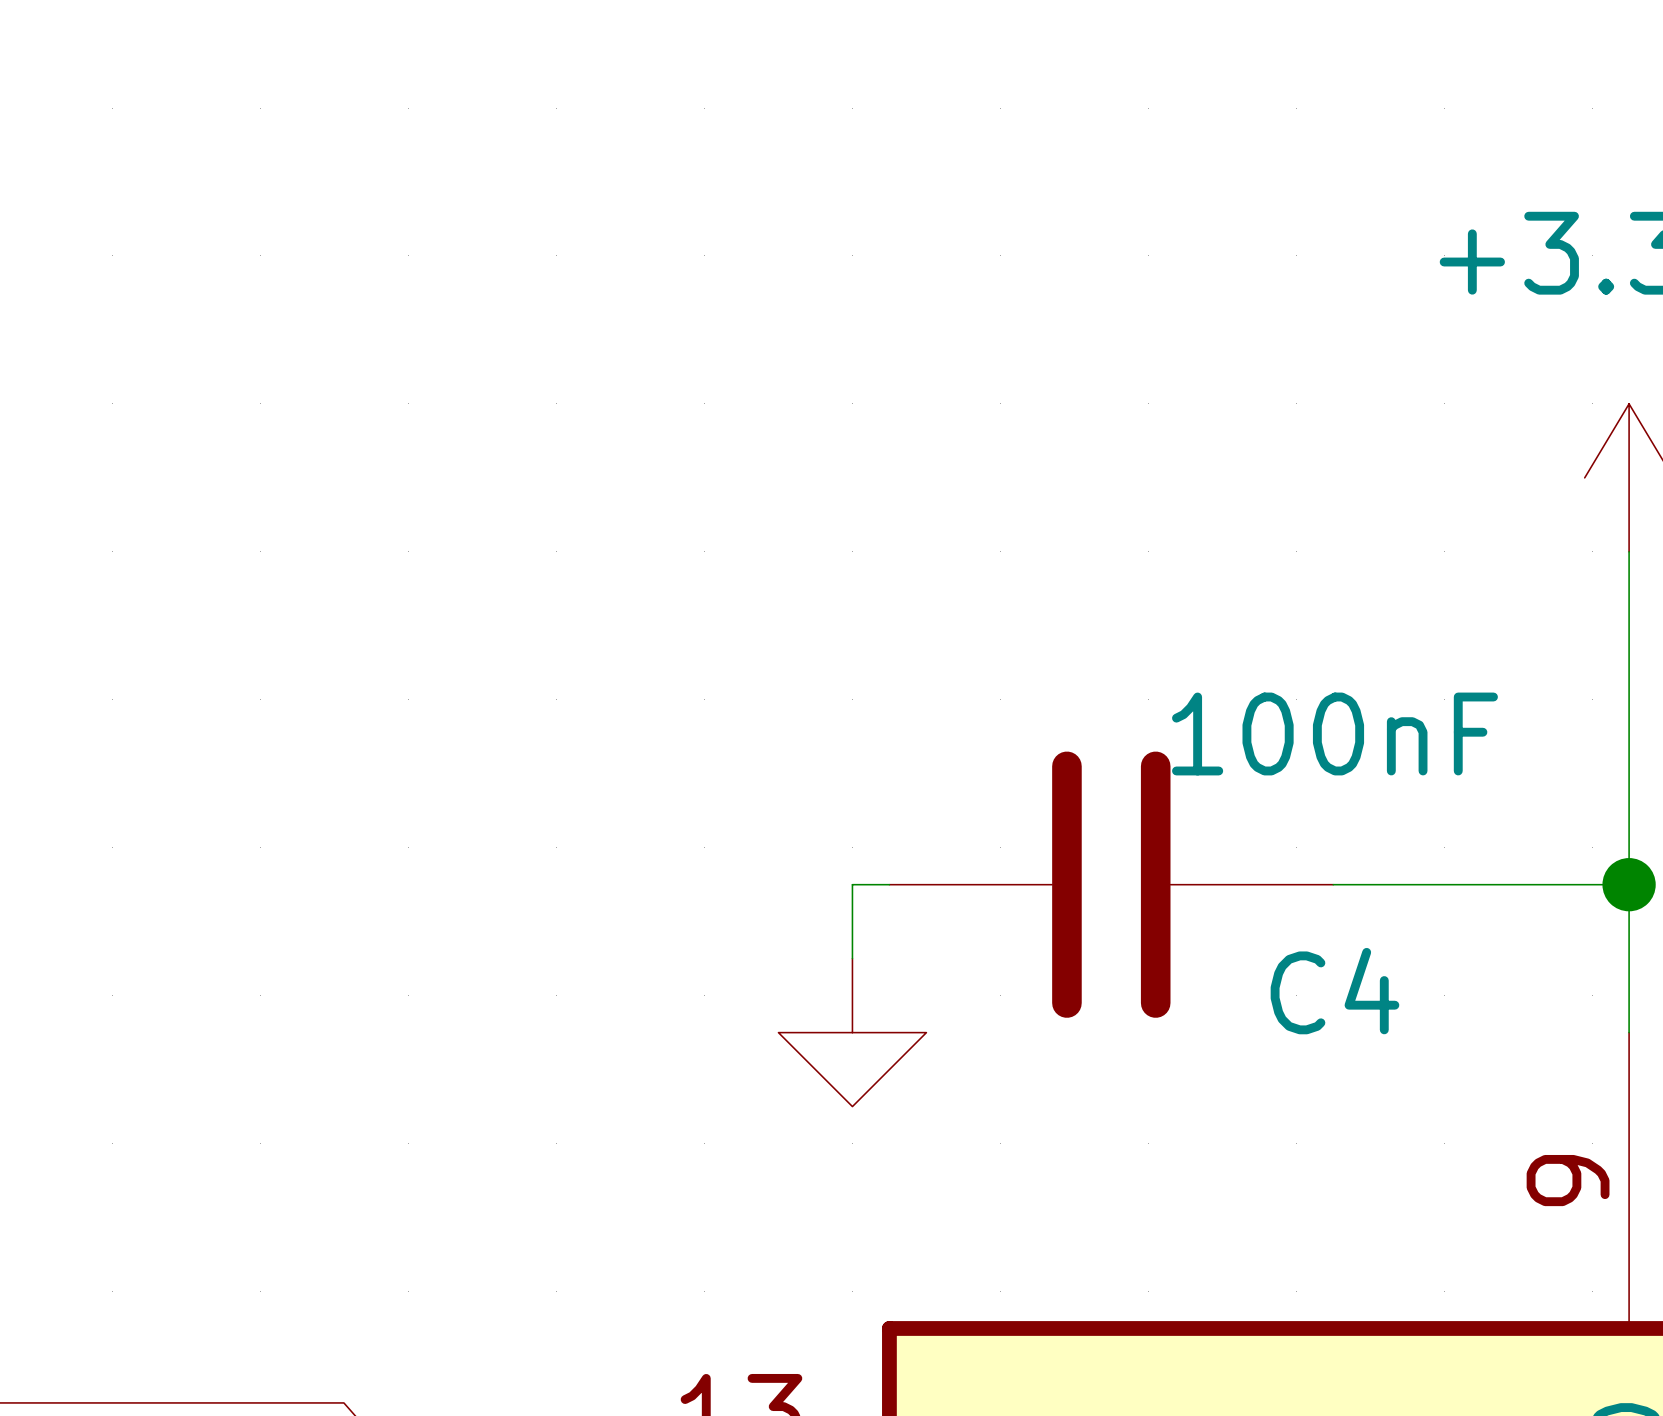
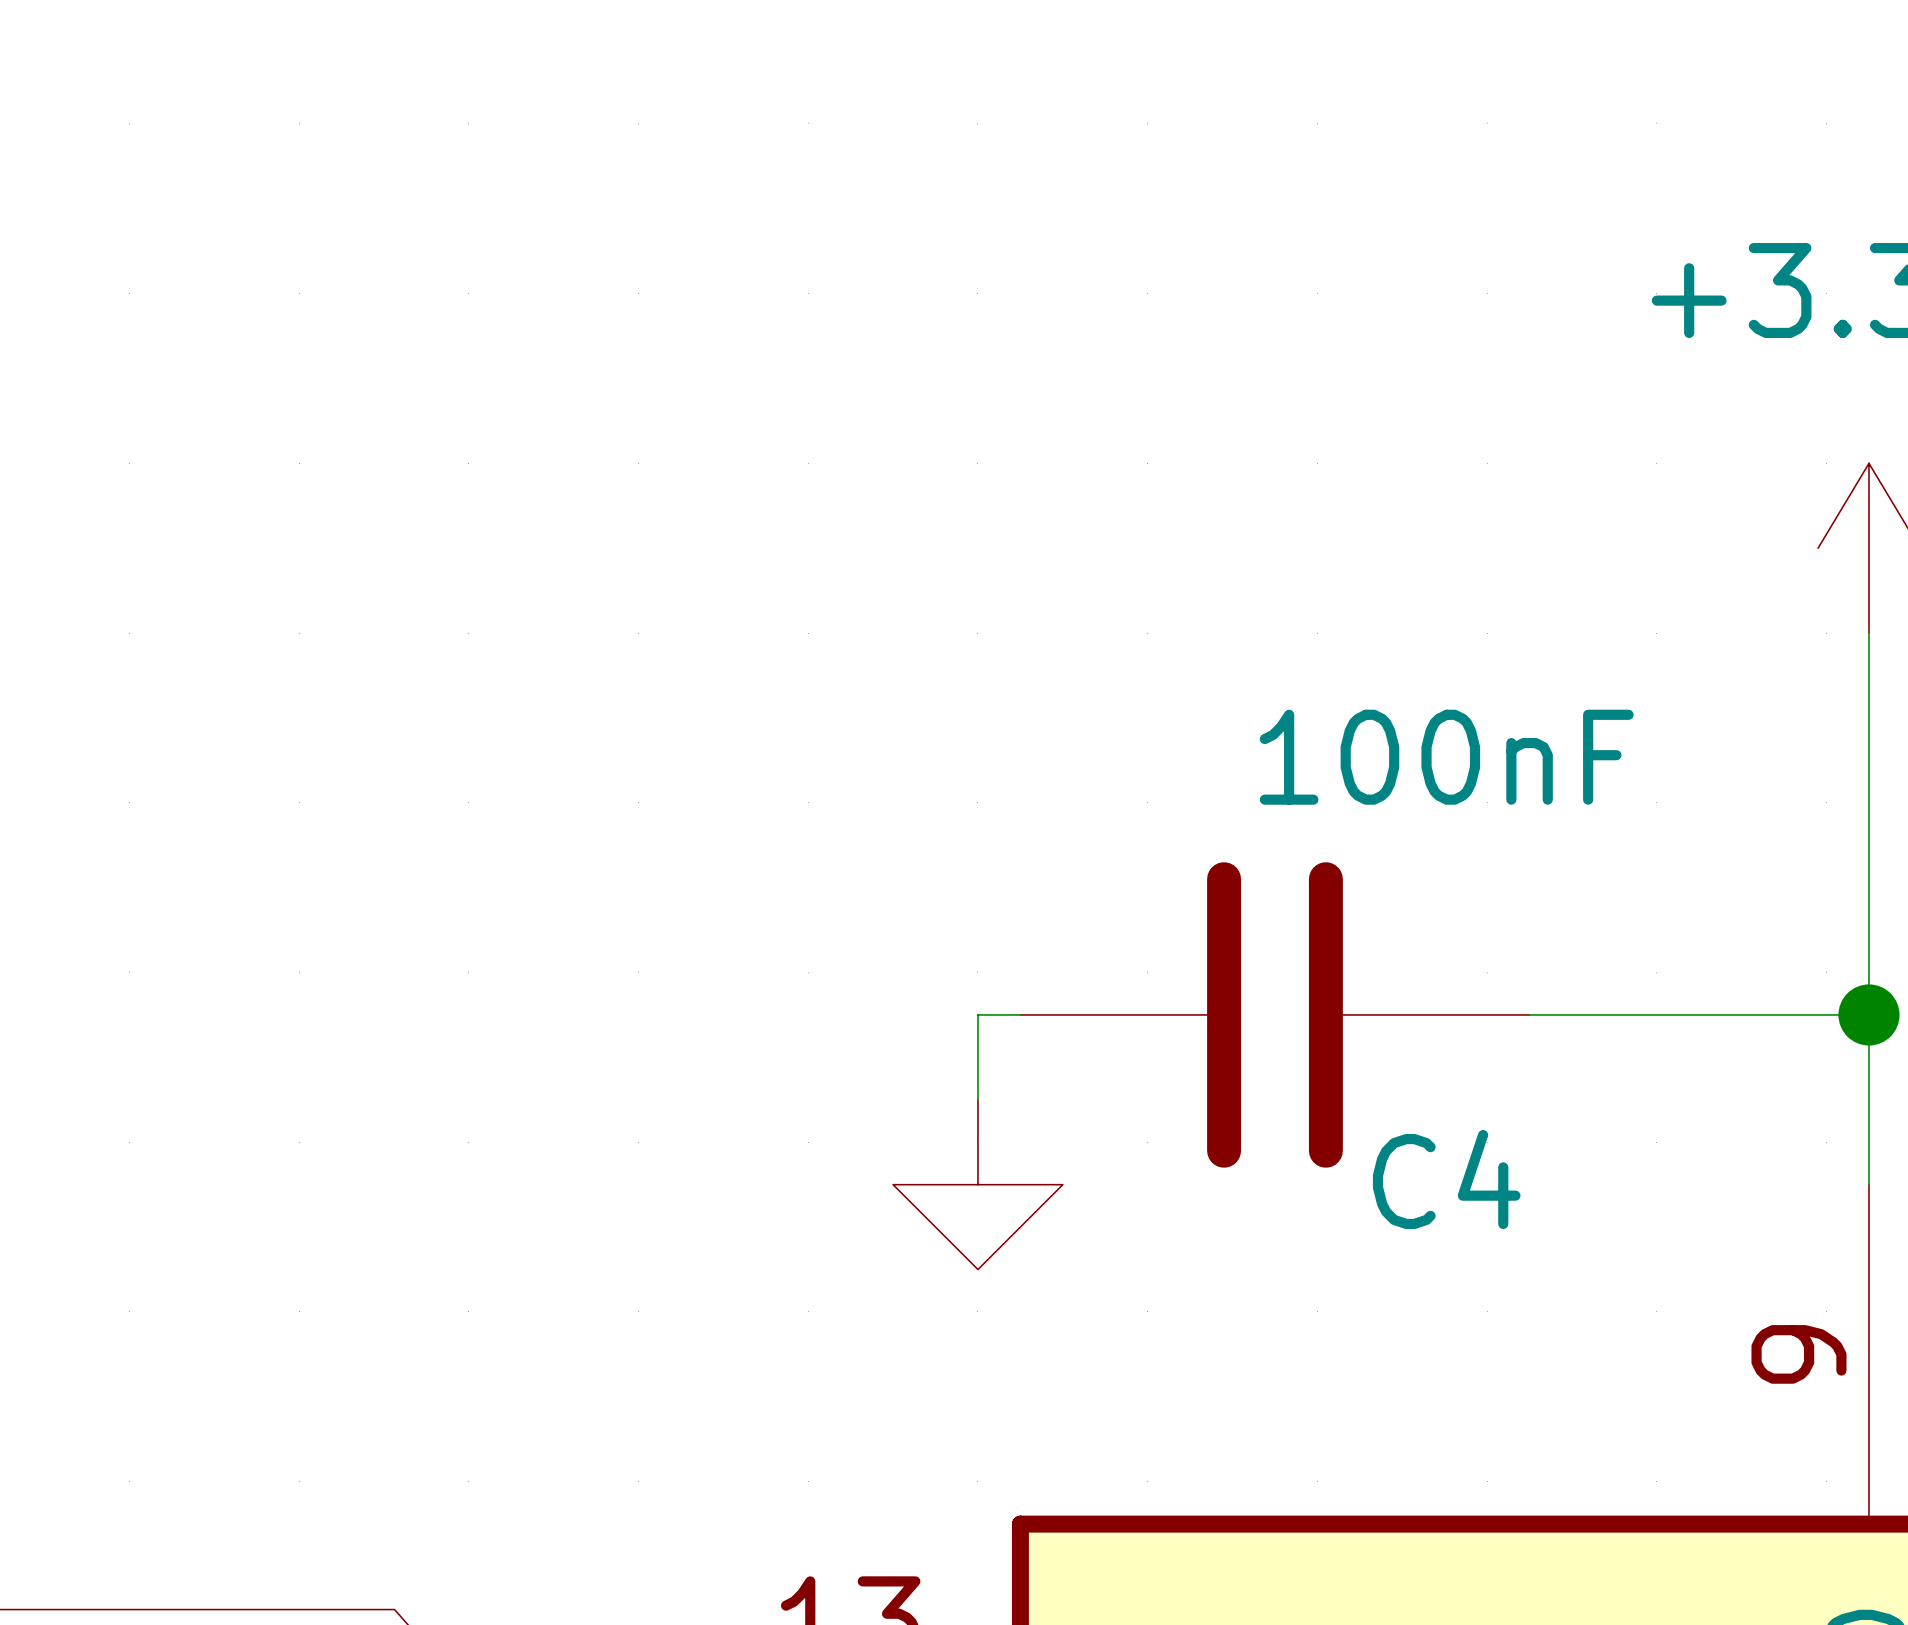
C4 value position: 100nF (1334, 733) -> 100nF (1446, 757)
C4 name position: C4 (1334, 991) -> C4 (1446, 1179)

